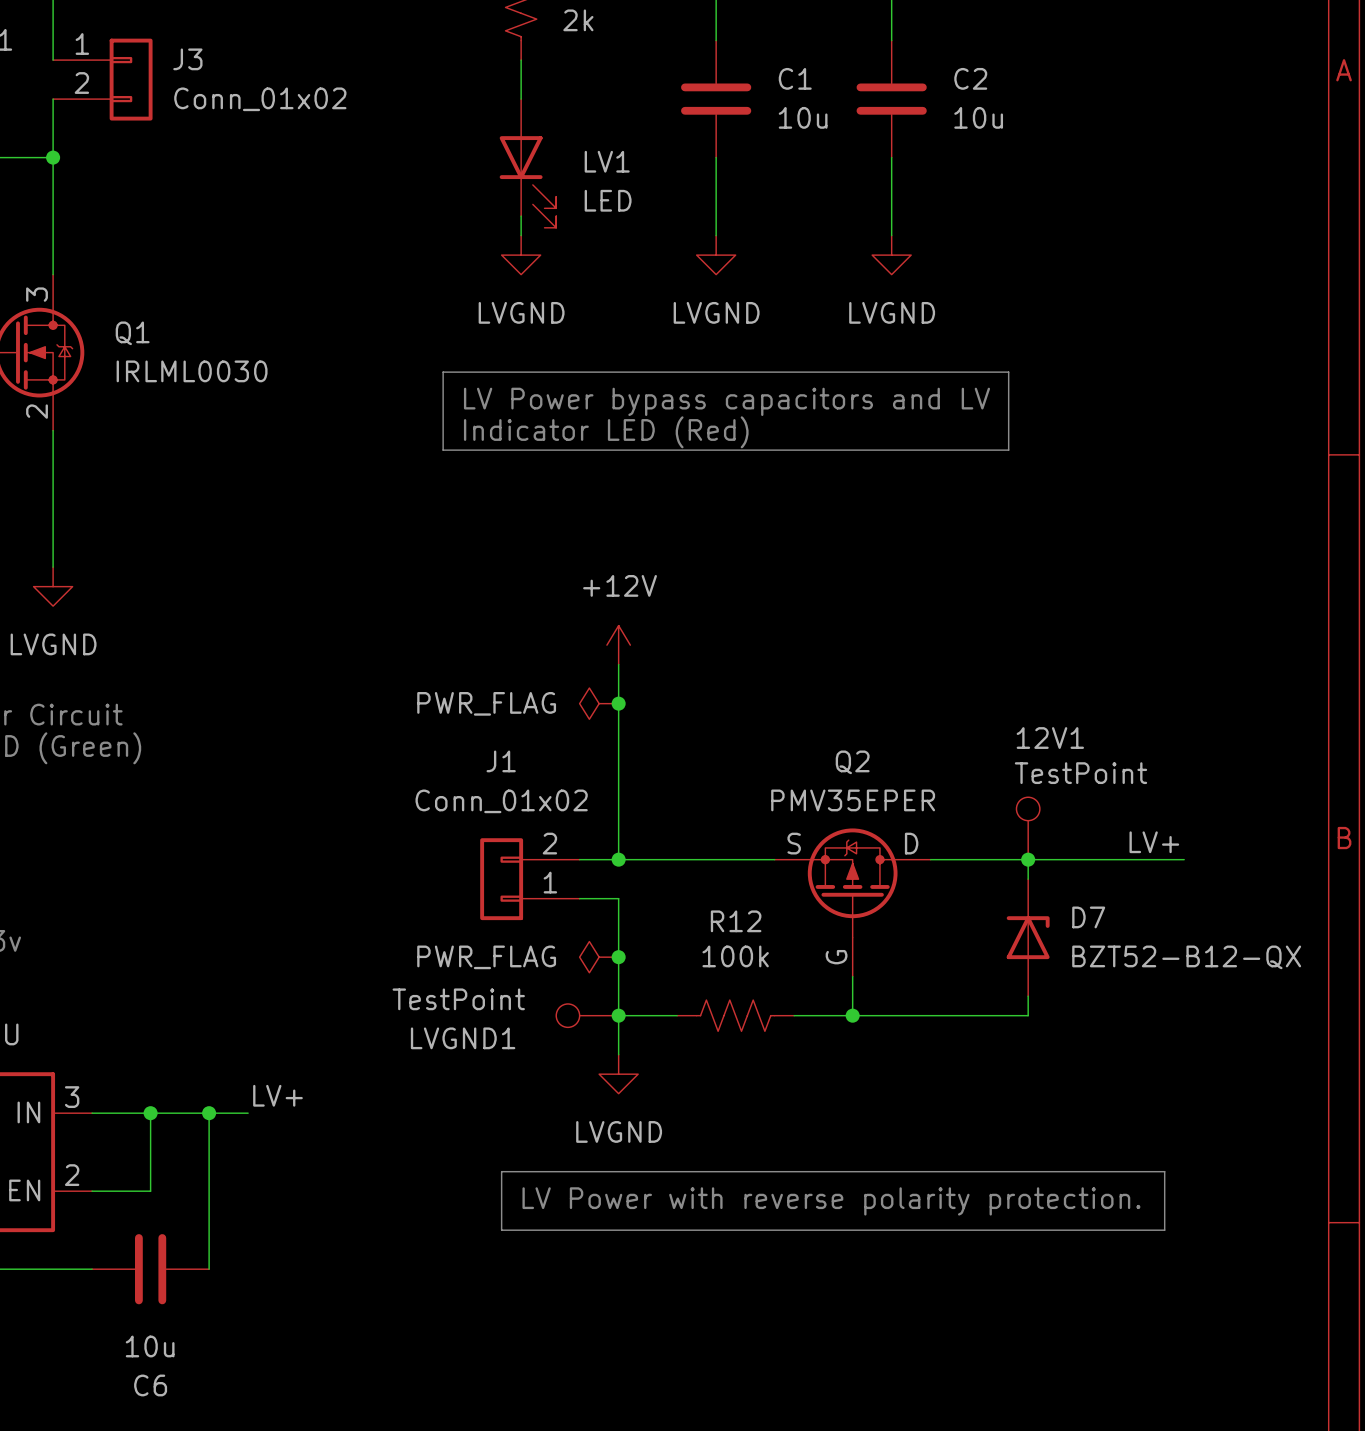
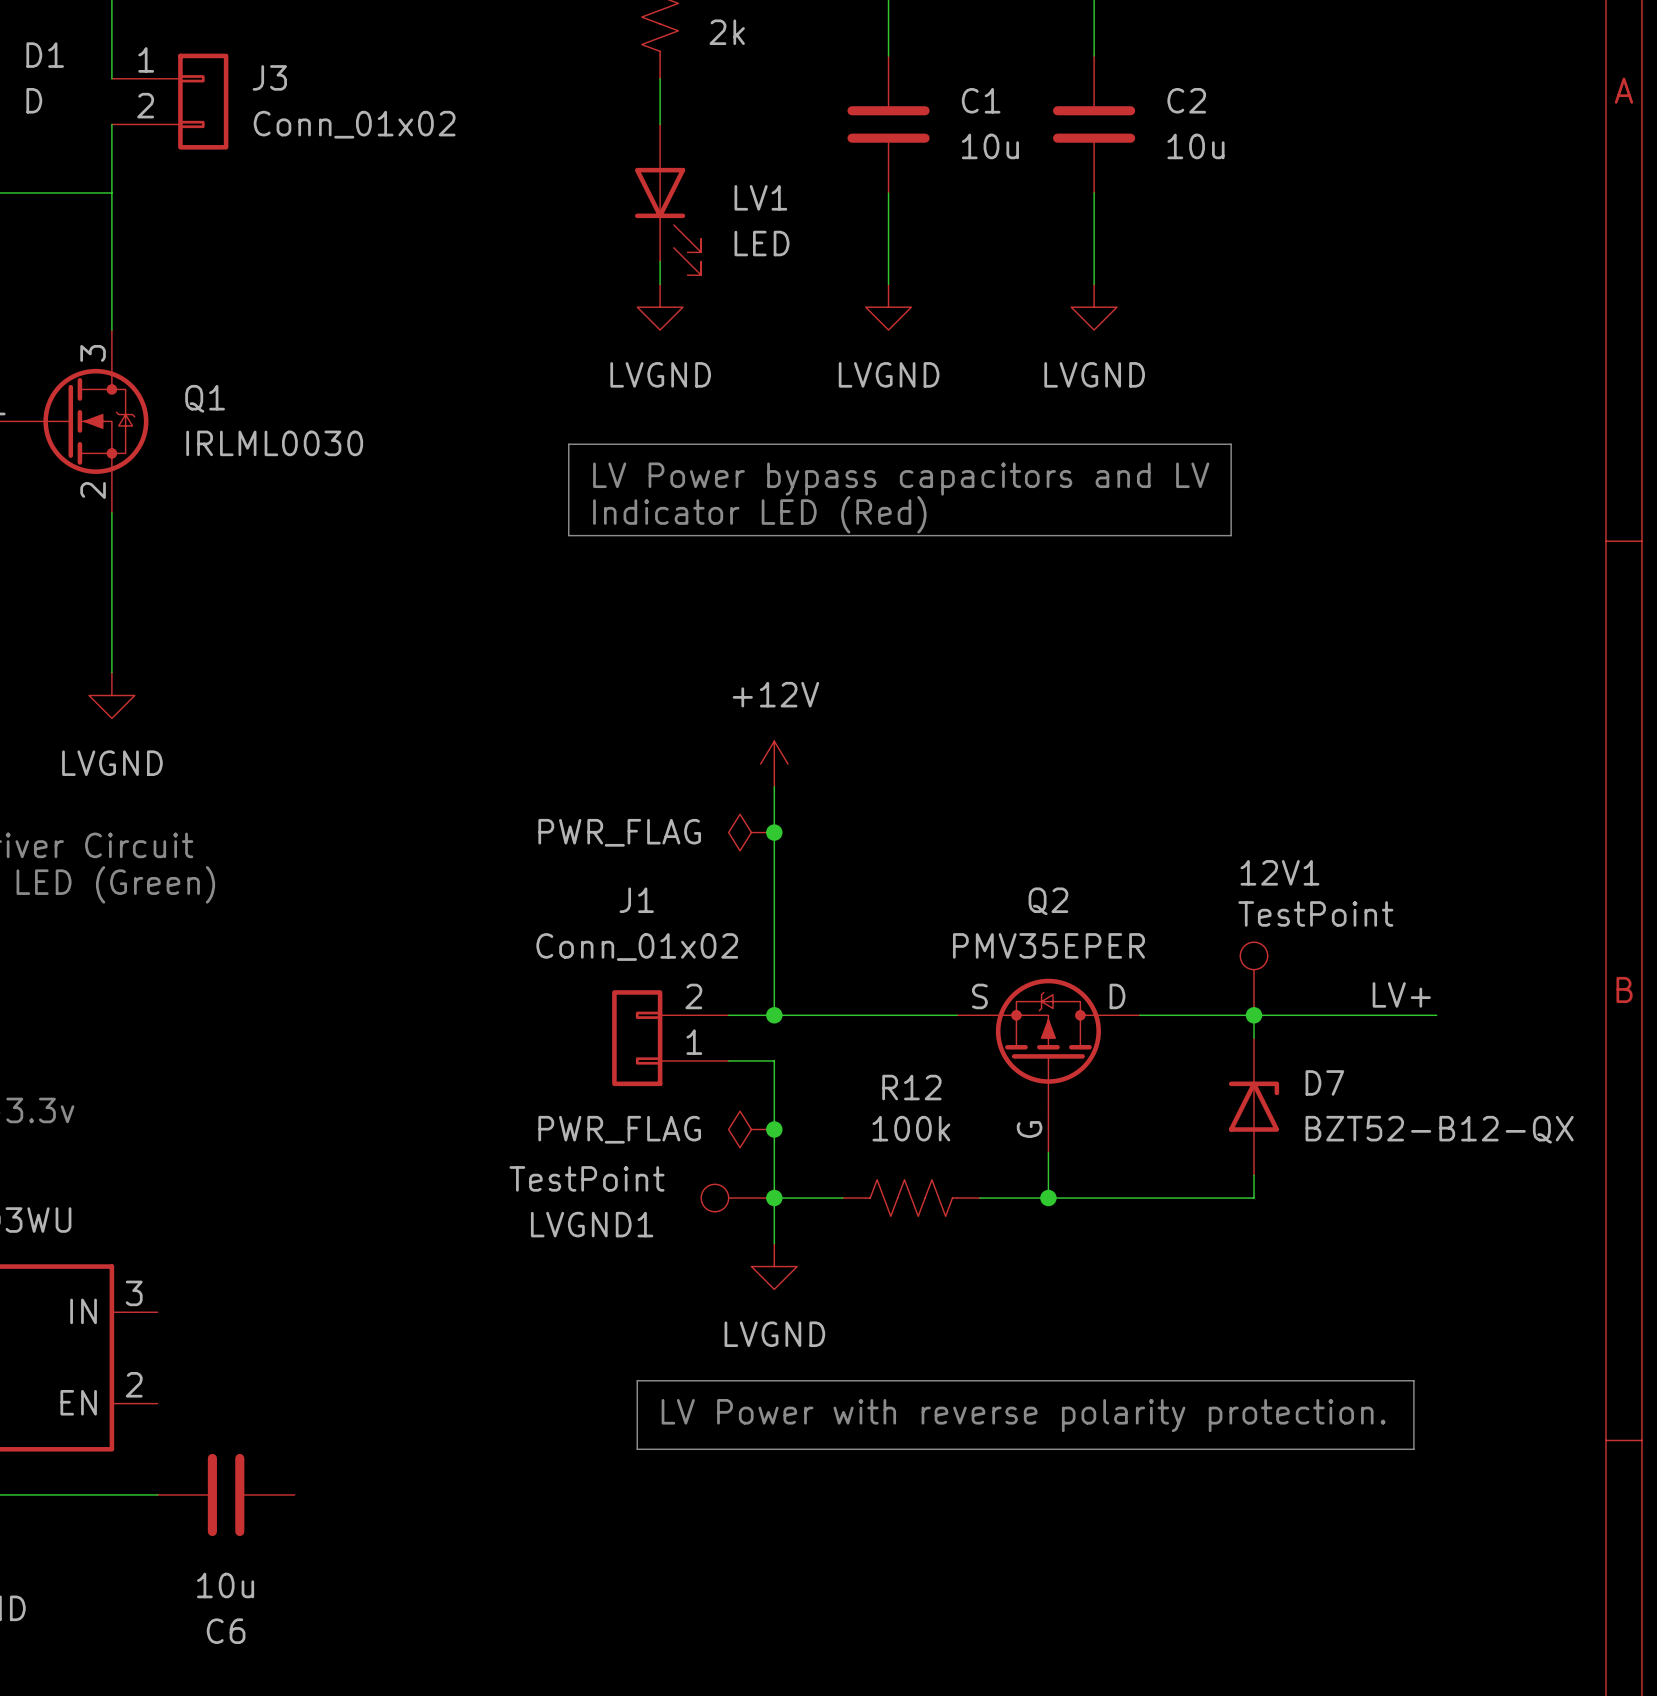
junction: (53, 157) -> none
label: LV+ (277, 1095) -> none
wire: (92, 1113) (248, 1113) -> none
wire: (150, 1113) (150, 1191) (92, 1191) -> none
junction: (150, 1113) -> none
wire: (209, 1113) (209, 1269) -> none
junction: (209, 1113) -> none

